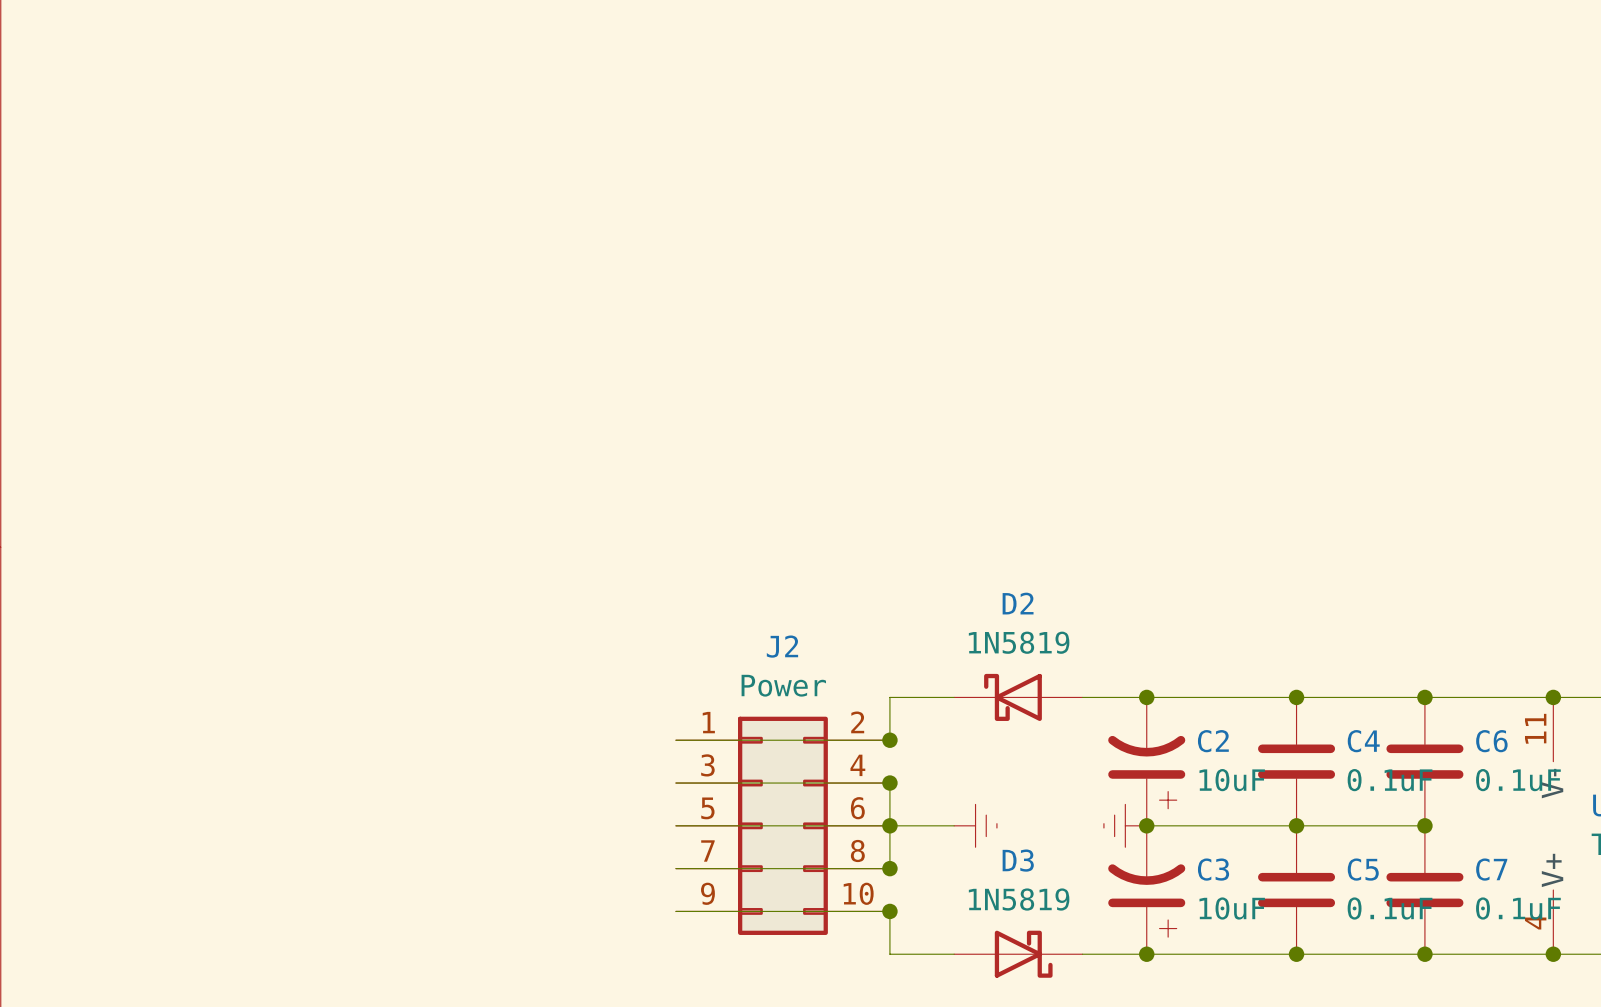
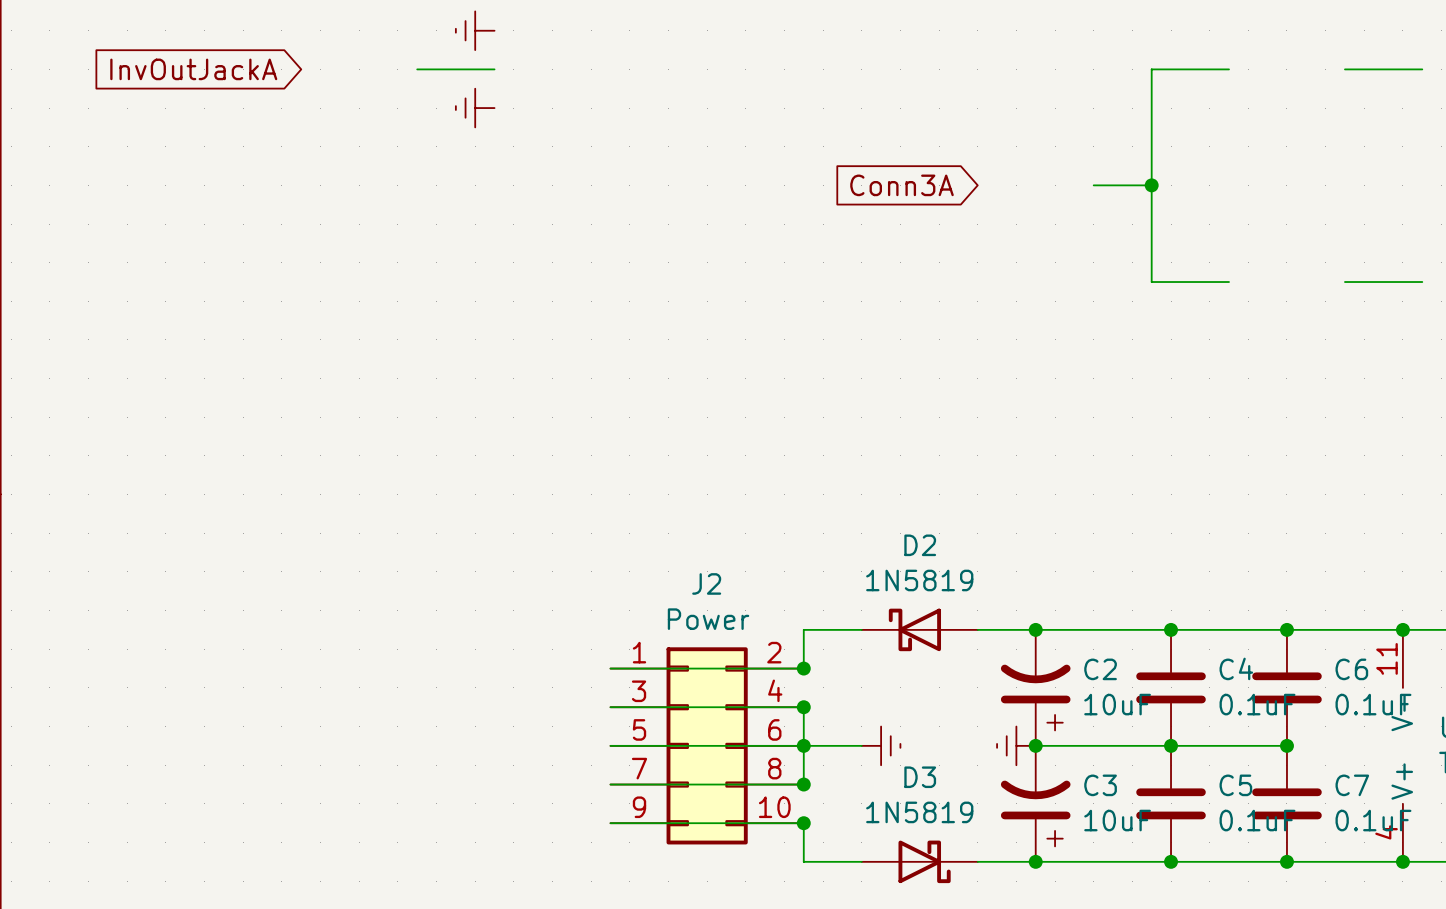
power symbol: none -> (475, 30)
global label: none -> InvOutJackA (193, 69)
wire: none -> (417, 69) (494, 69)
wire: none -> (1229, 69) (1151, 69) (1151, 282) (1229, 282)
wire: none -> (1344, 69) (1422, 69)
power symbol: none -> (475, 108)
global label: none -> Conn3A (902, 185)
wire: none -> (1093, 185) (1151, 185)
junction: none -> (1151, 185)
wire: none -> (1344, 282) (1422, 282)

